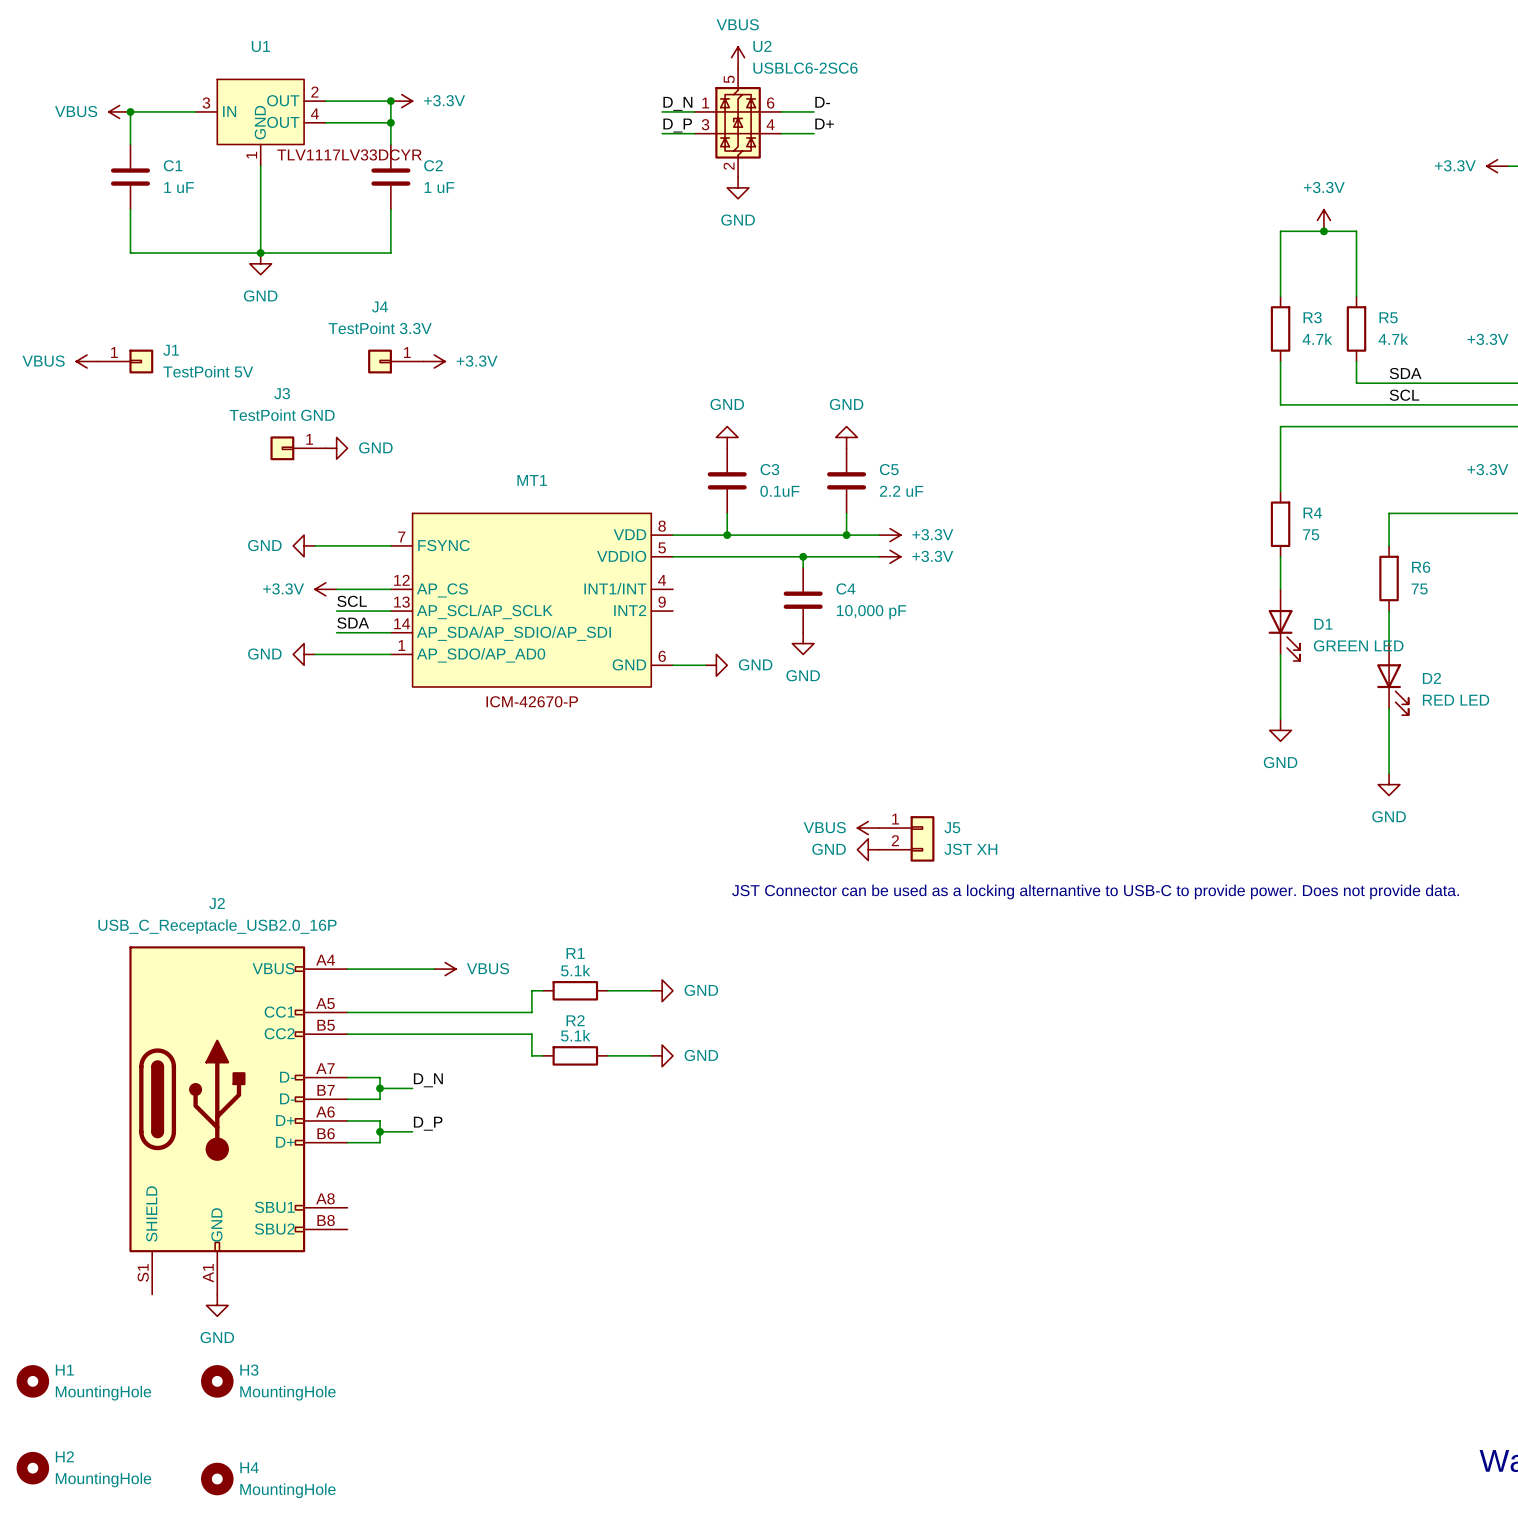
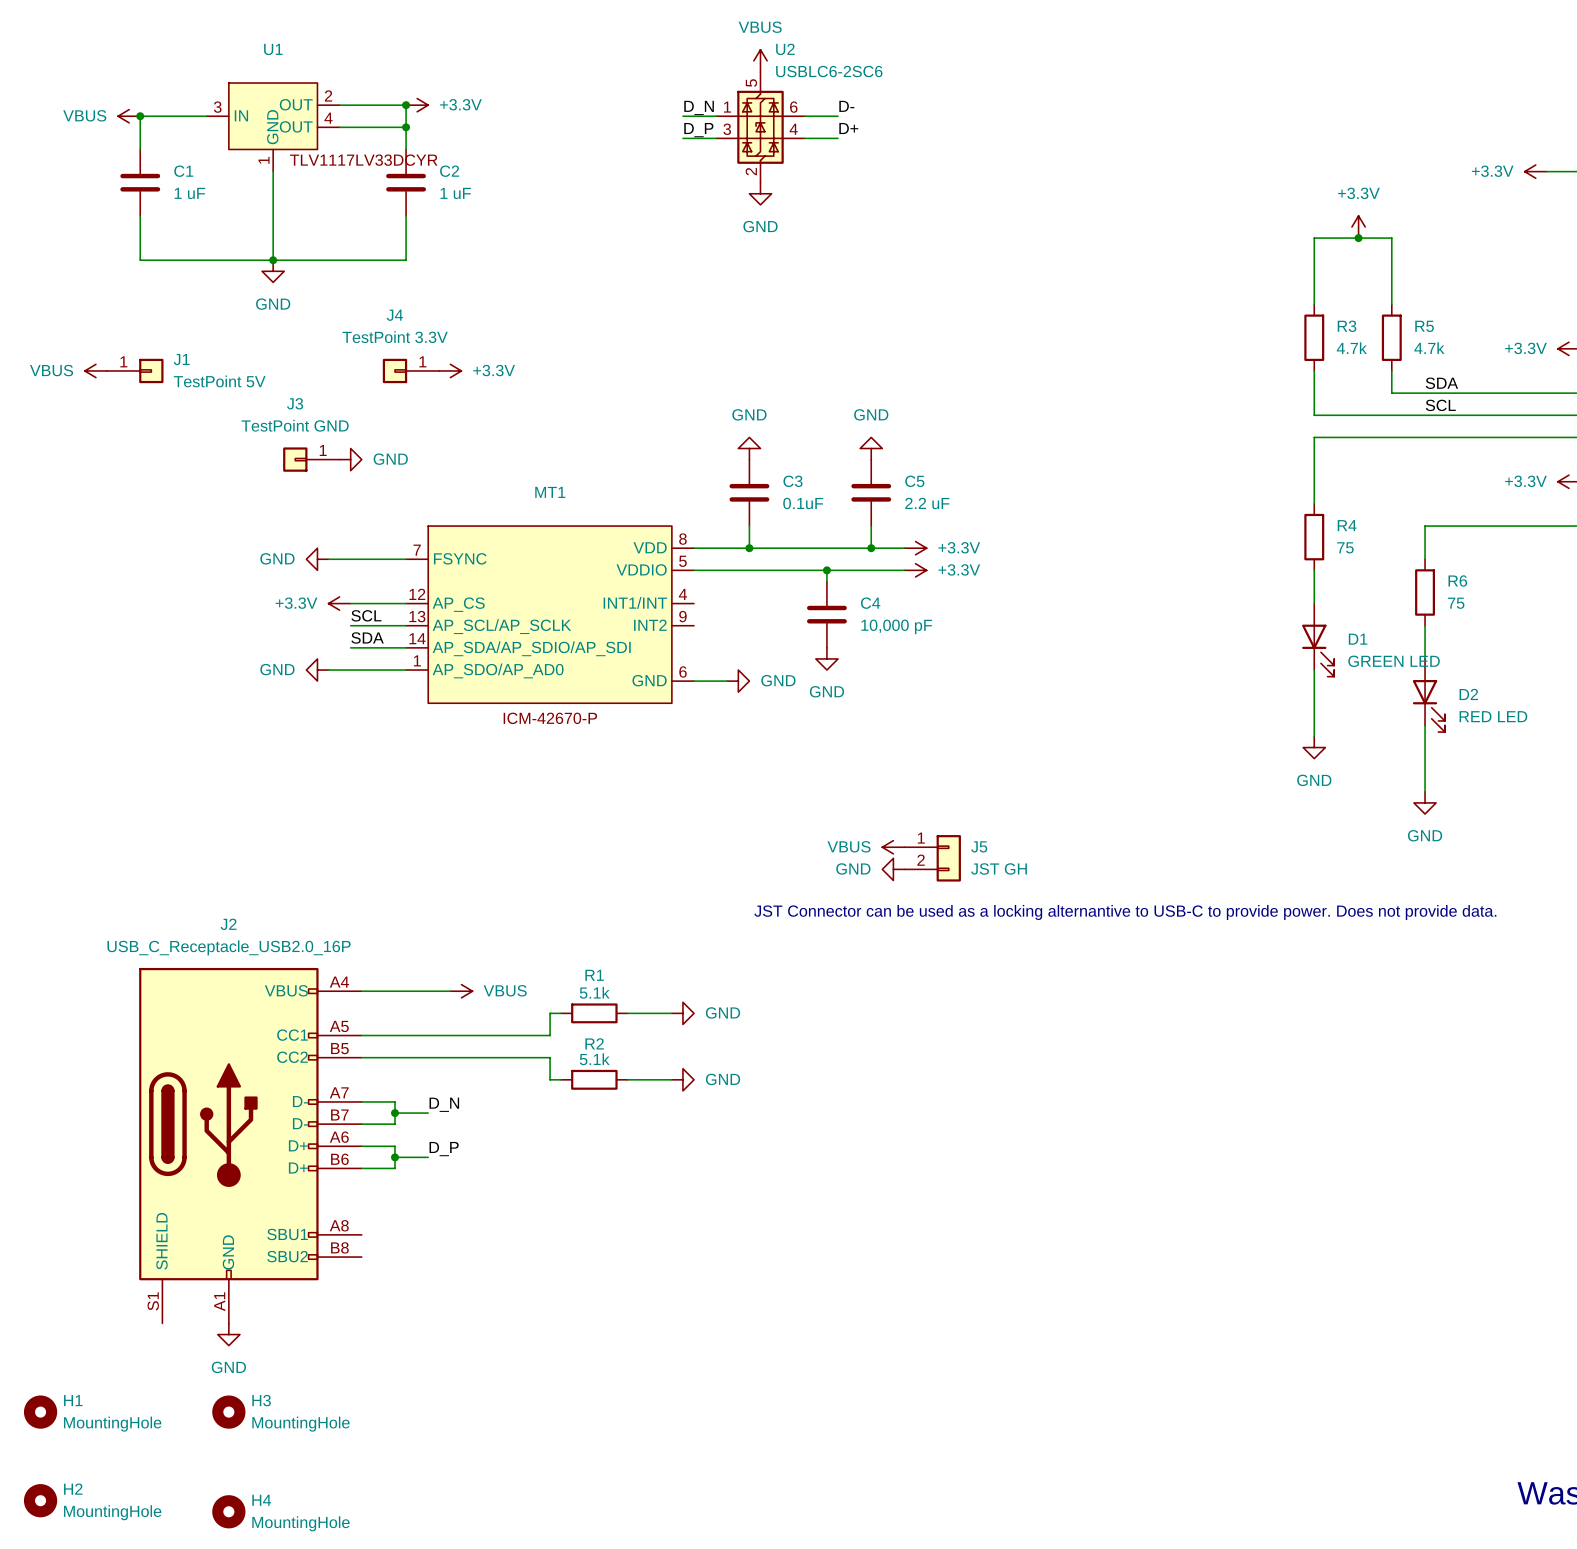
J5 value: JST XH (970, 849) -> JST GH (999, 868)

